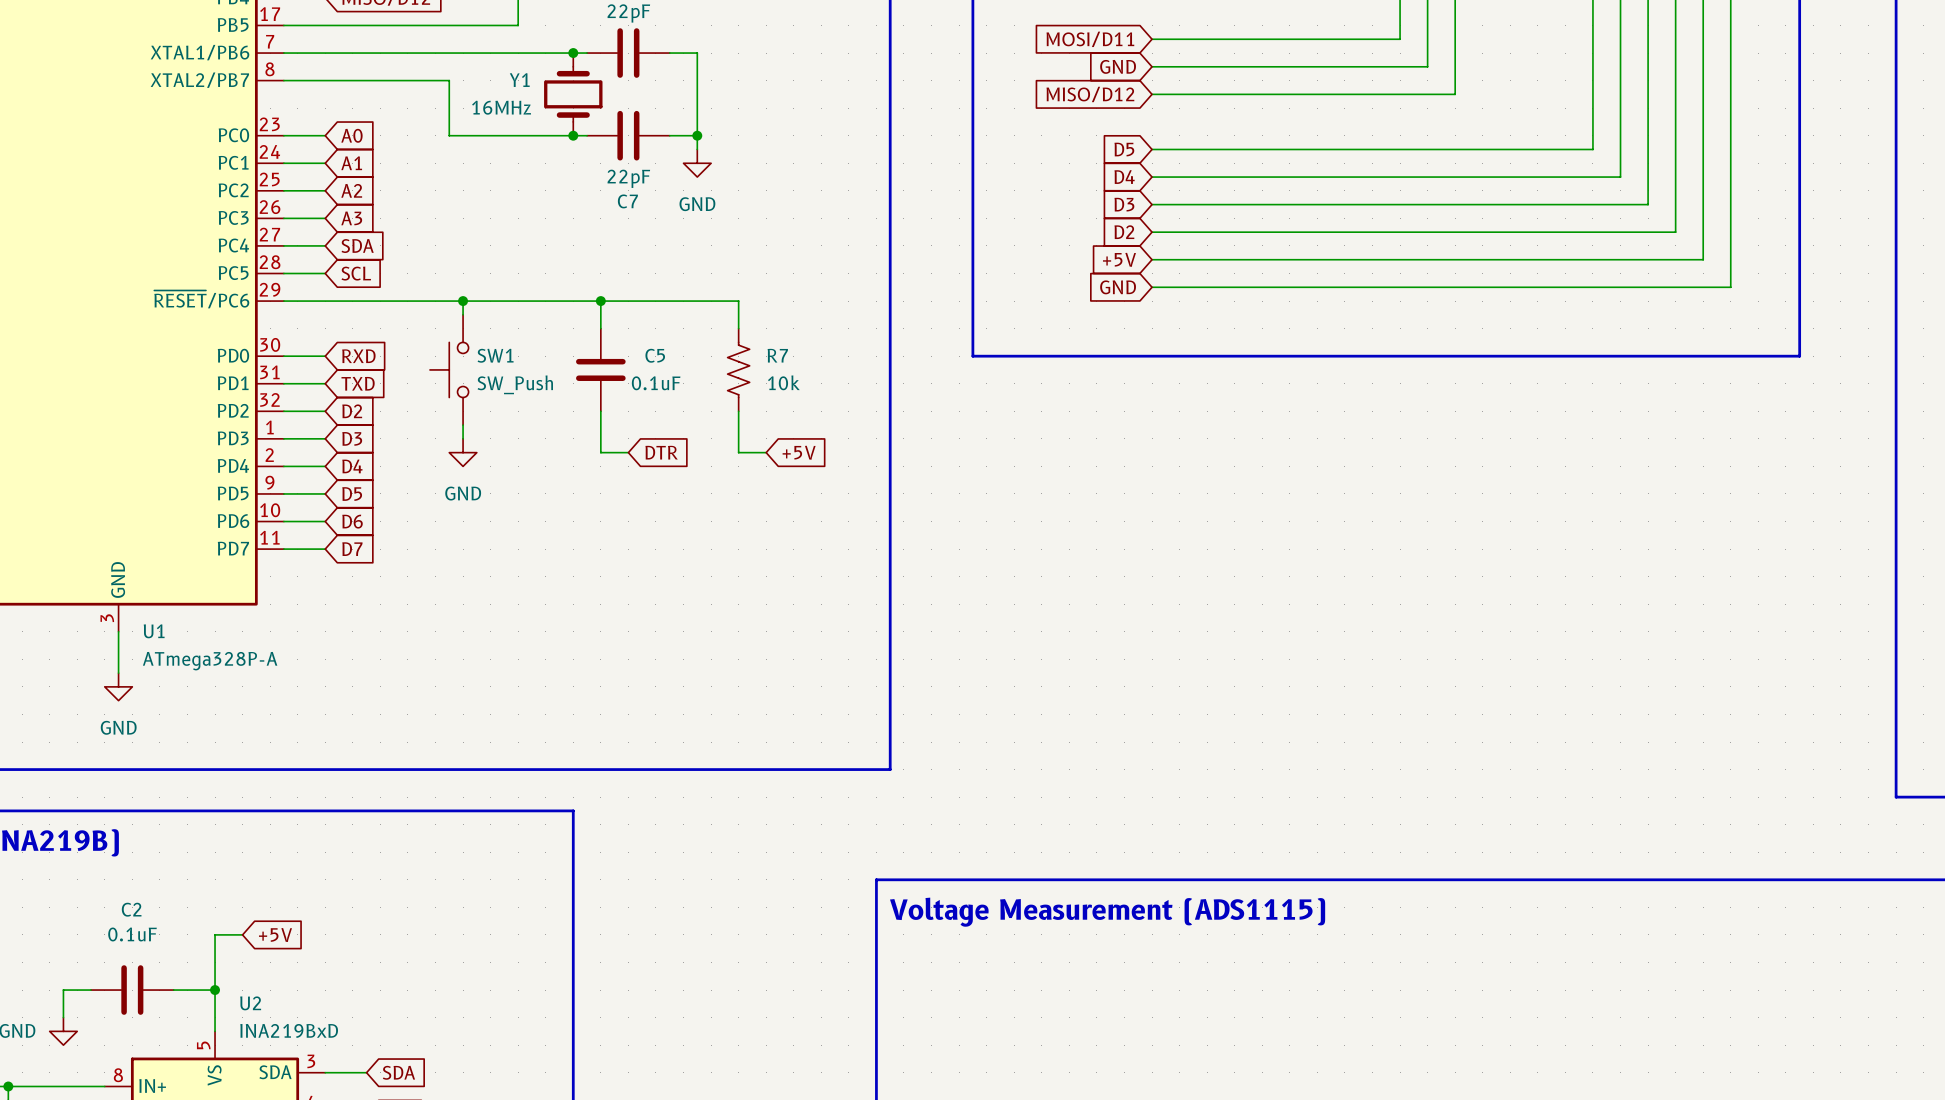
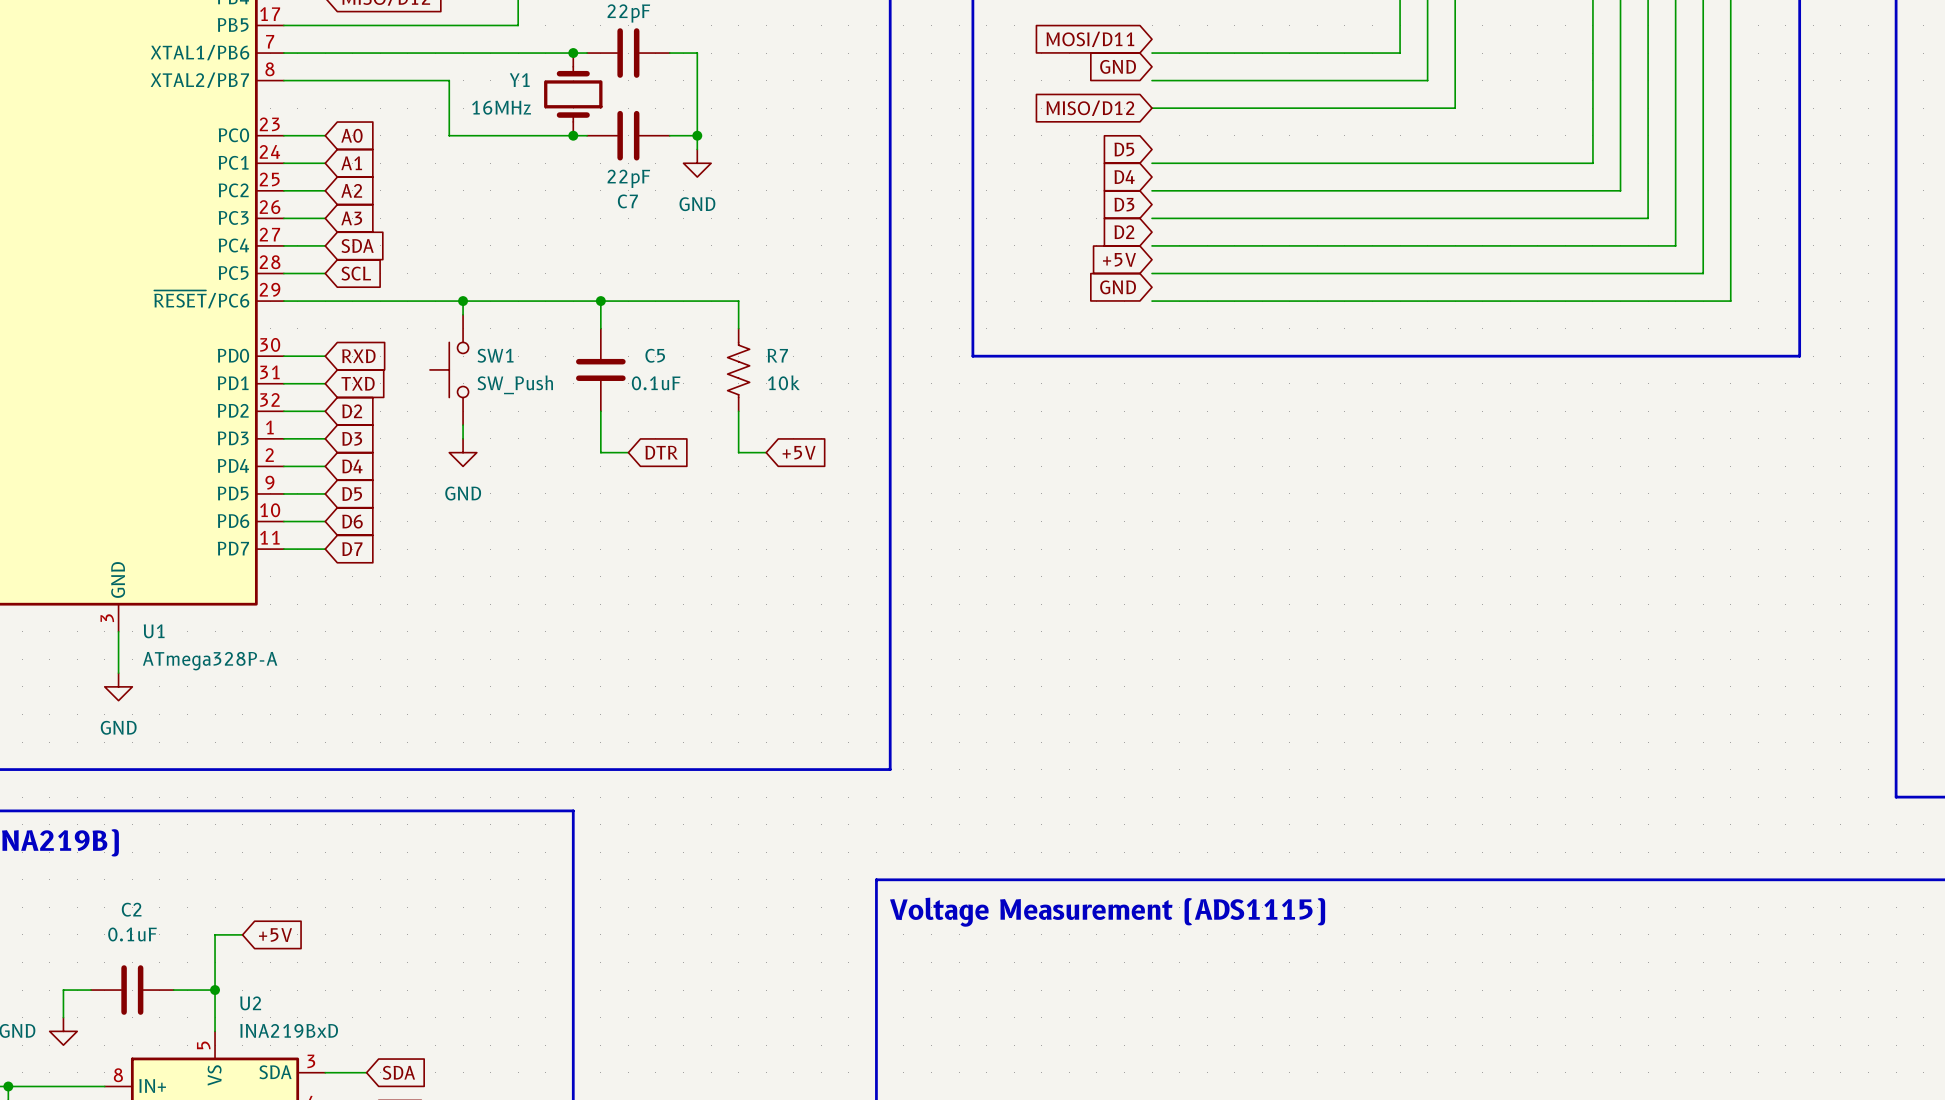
wire: (1152, 39) (1400, 39) -> (1152, 53) (1400, 53) (1400, 39)
wire: (1152, 66) (1427, 66) -> (1152, 80) (1427, 80) (1427, 66)
global label position: MISO/D12 (1090, 94) -> MISO/D12 (1090, 108)
wire: (1152, 94) (1455, 94) -> (1152, 108) (1455, 108) (1455, 94)
wire: (1152, 149) (1592, 149) -> (1152, 163) (1592, 163) (1592, 149)
wire: (1152, 177) (1620, 177) -> (1152, 190) (1620, 190) (1620, 177)
wire: (1152, 204) (1648, 204) -> (1152, 218) (1648, 218) (1648, 204)
wire: (1152, 232) (1675, 232) -> (1152, 245) (1675, 245) (1675, 232)
wire: (1152, 259) (1703, 259) -> (1152, 273) (1703, 273) (1703, 259)
wire: (1152, 287) (1730, 287) -> (1152, 301) (1730, 301) (1730, 287)

